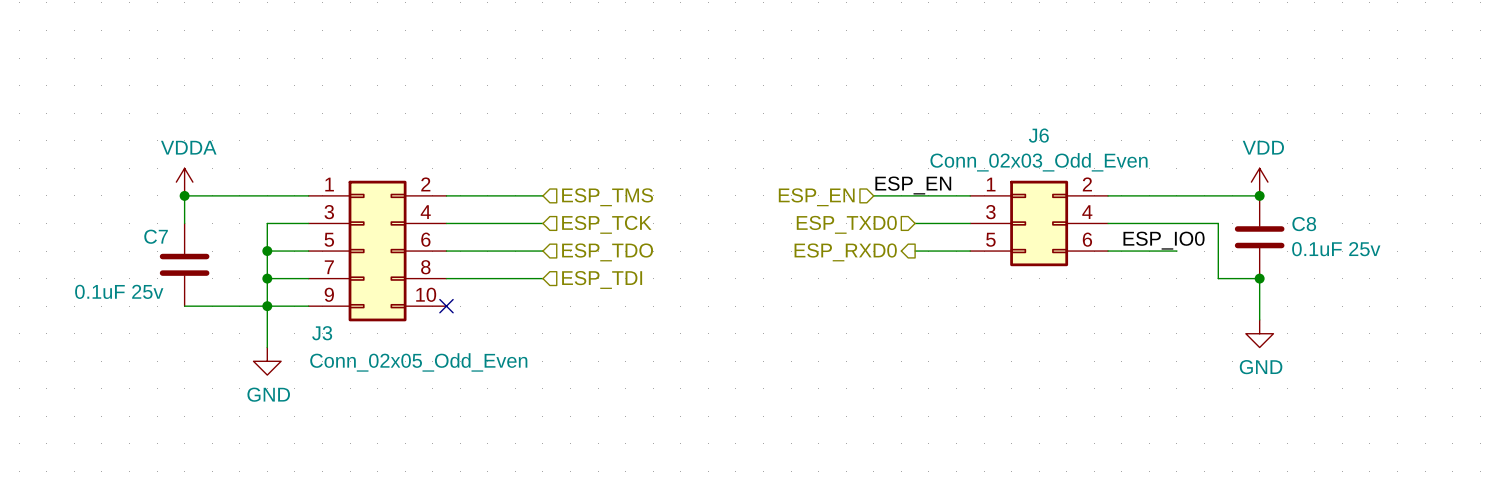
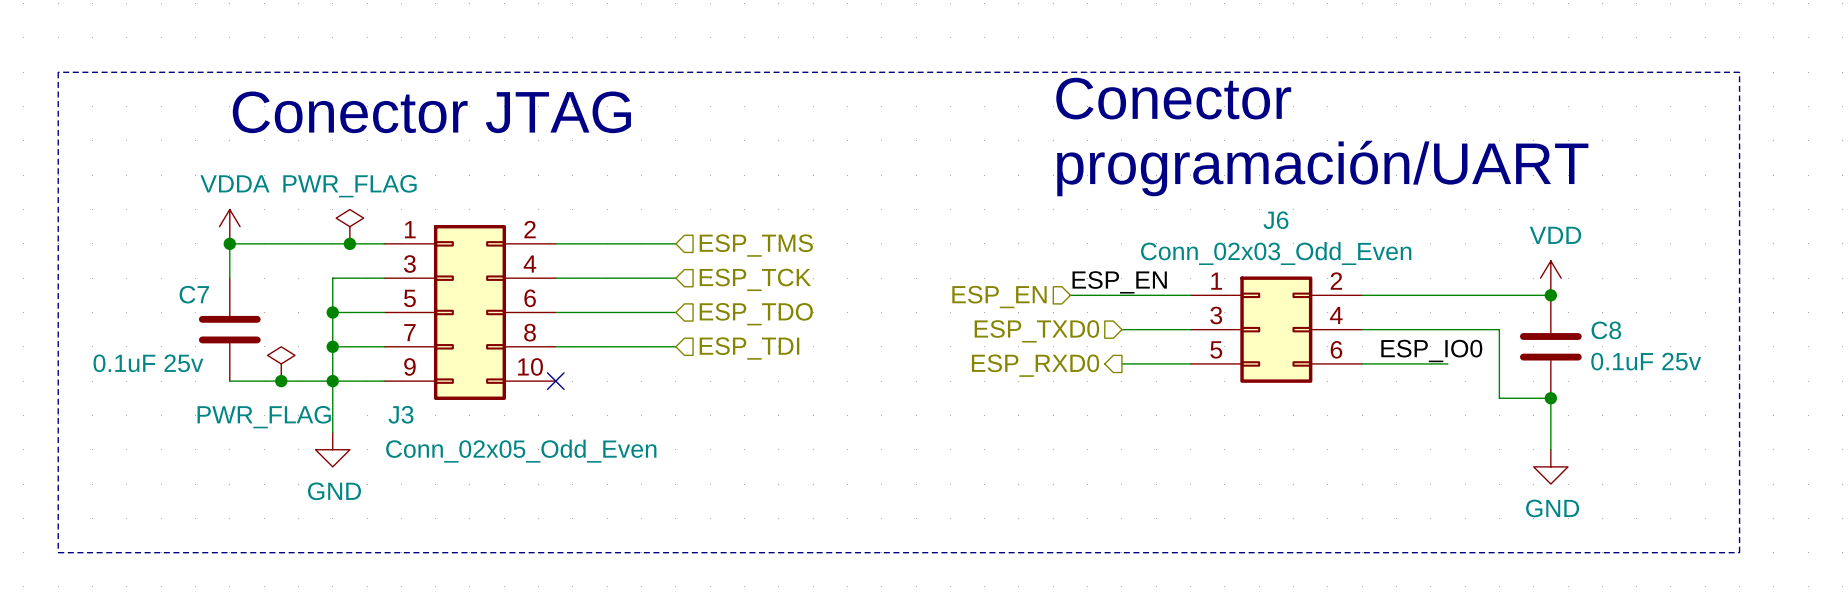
line: none -> (58, 72) (58, 552) (1739, 552) (1739, 72) (58, 72)
text: none -> Conector (1173, 98)
text: none -> Conector JTAG (431, 112)
text: none -> programación/UART (1322, 168)
power symbol: none -> PWR_FLAG (349, 226)
power symbol position: VDD (1259, 182) -> VDD (1550, 278)
label position: ESP_EN (913, 185) -> ESP_EN (1119, 282)
junction: none -> (349, 243)
wire: (873, 195) (970, 195) -> (1070, 295) (1190, 295)
wire: (1108, 195) (1259, 195) -> (1362, 295) (1550, 295)
junction: (1259, 195) -> none
hierarchical label position: ESP_EN (816, 197) -> ESP_EN (999, 297)
wire: (915, 223) (970, 223) -> (1121, 329) (1190, 329)
J6 position: (1039, 223) -> (1276, 329)
wire: (1108, 223) (1218, 223) (1218, 278) (1259, 278) (1259, 319) -> (1362, 329) (1499, 329) (1499, 398) (1550, 398) (1550, 449)
hierarchical label position: ESP_TXD0 (846, 224) -> ESP_TXD0 (1036, 331)
junction: none -> (1550, 295)
C8 position: (1259, 237) -> (1550, 346)
label position: ESP_IO0 (1164, 240) -> ESP_IO0 (1431, 350)
wire: (915, 251) (970, 251) -> (1121, 363) (1190, 363)
wire: (1108, 251) (1176, 251) -> (1362, 363) (1447, 363)
hierarchical label position: ESP_RXD0 (845, 252) -> ESP_RXD0 (1035, 365)
junction: (1259, 278) -> none
power symbol: none -> PWR_FLAG (281, 363)
junction: none -> (281, 381)
junction: none -> (1550, 398)
power symbol position: GND (1259, 333) -> GND (1550, 466)

